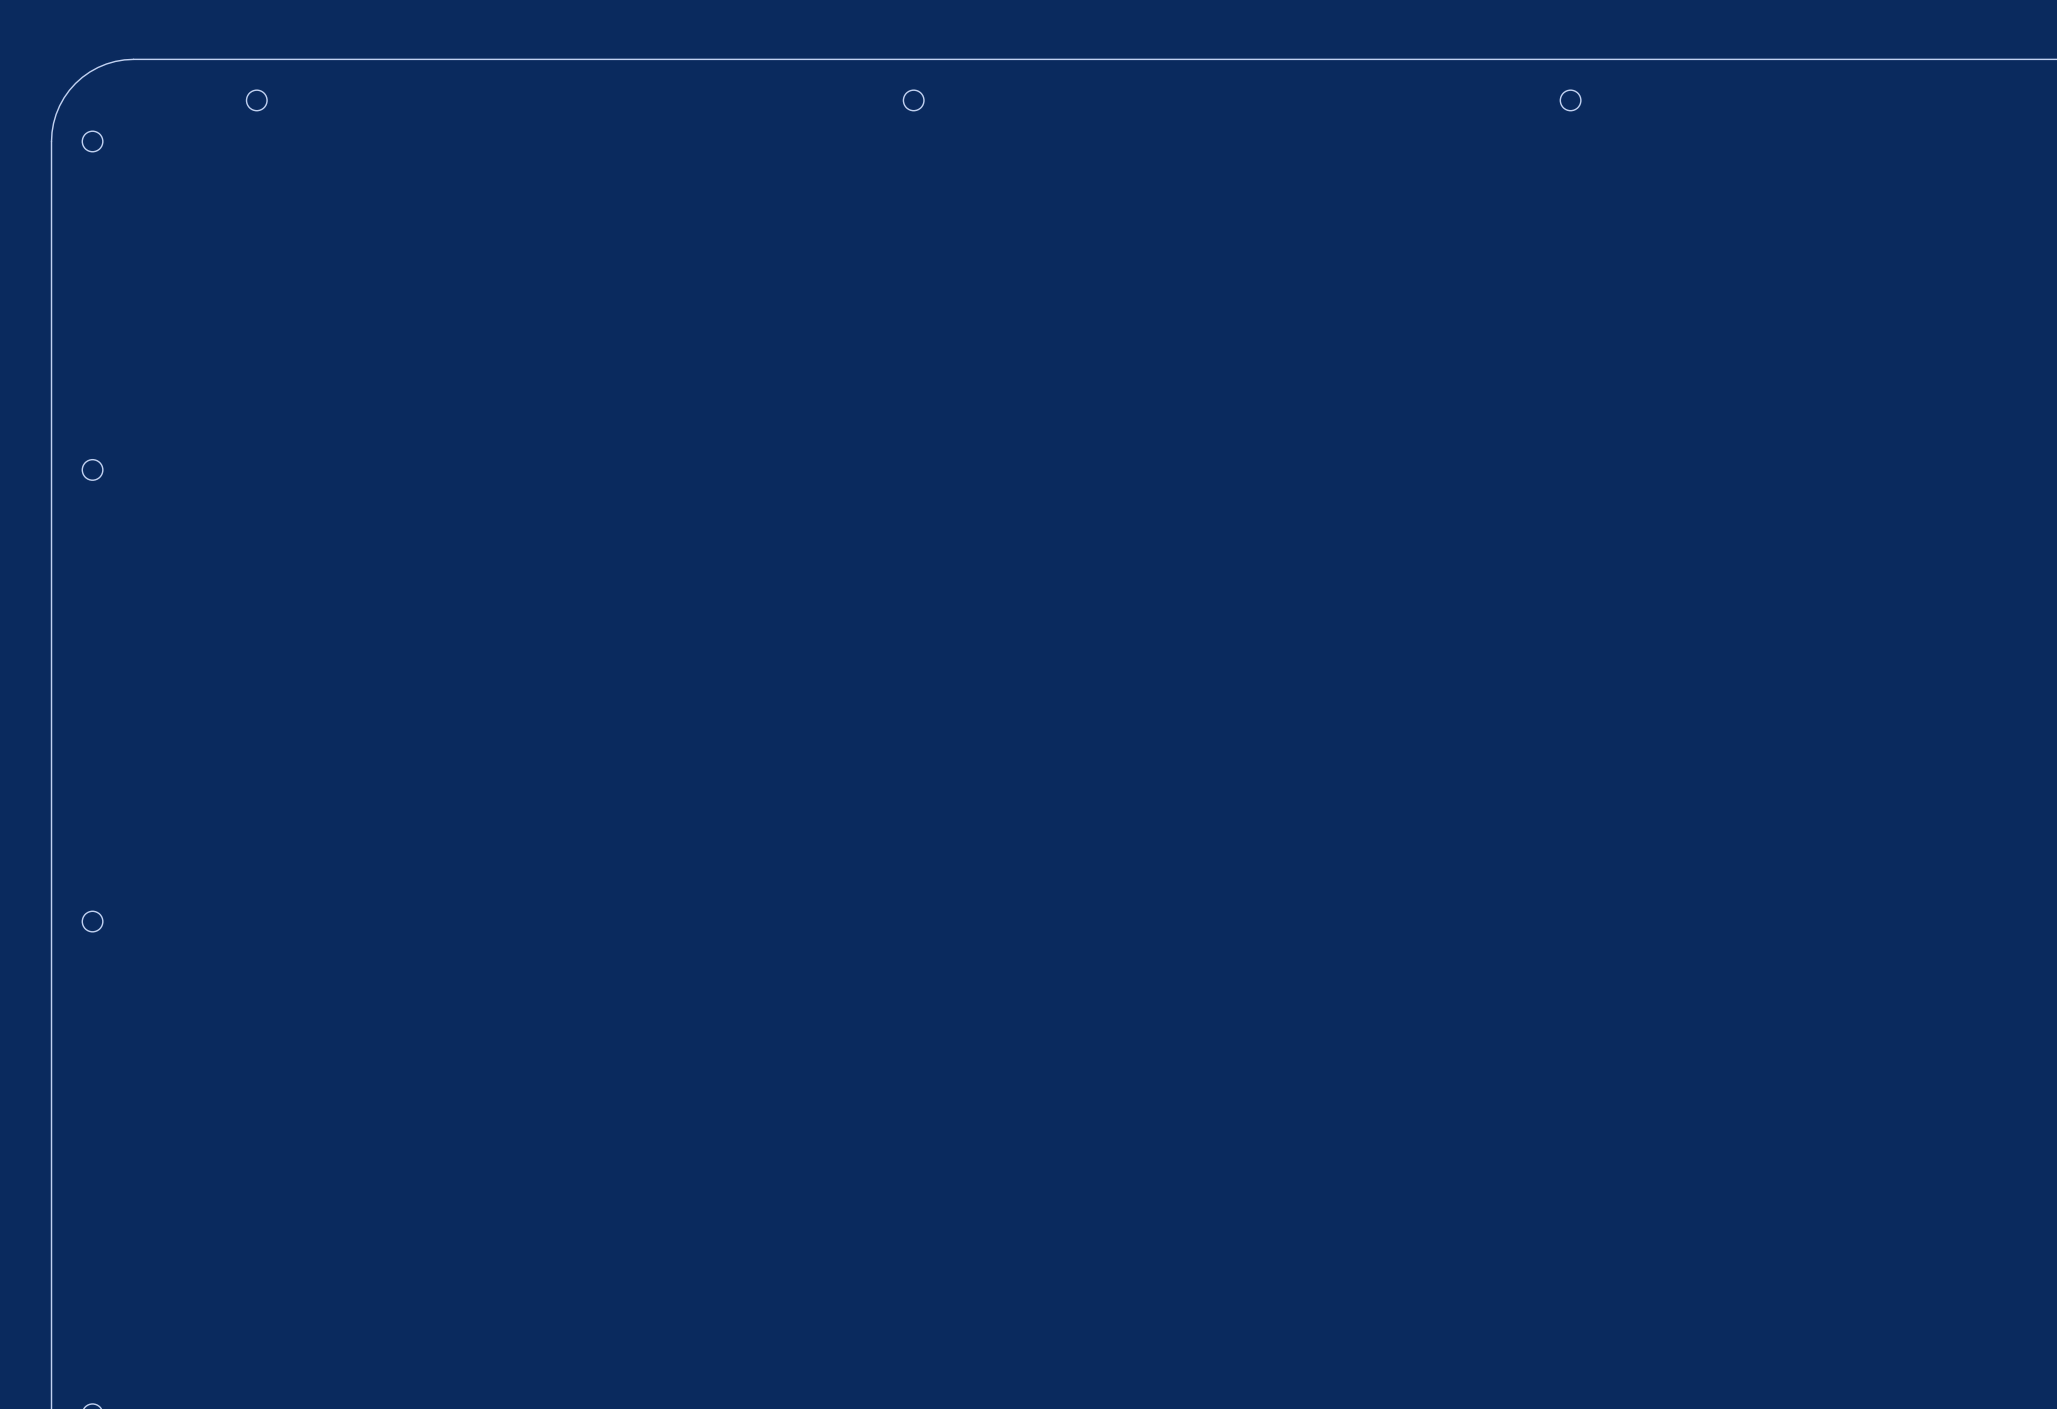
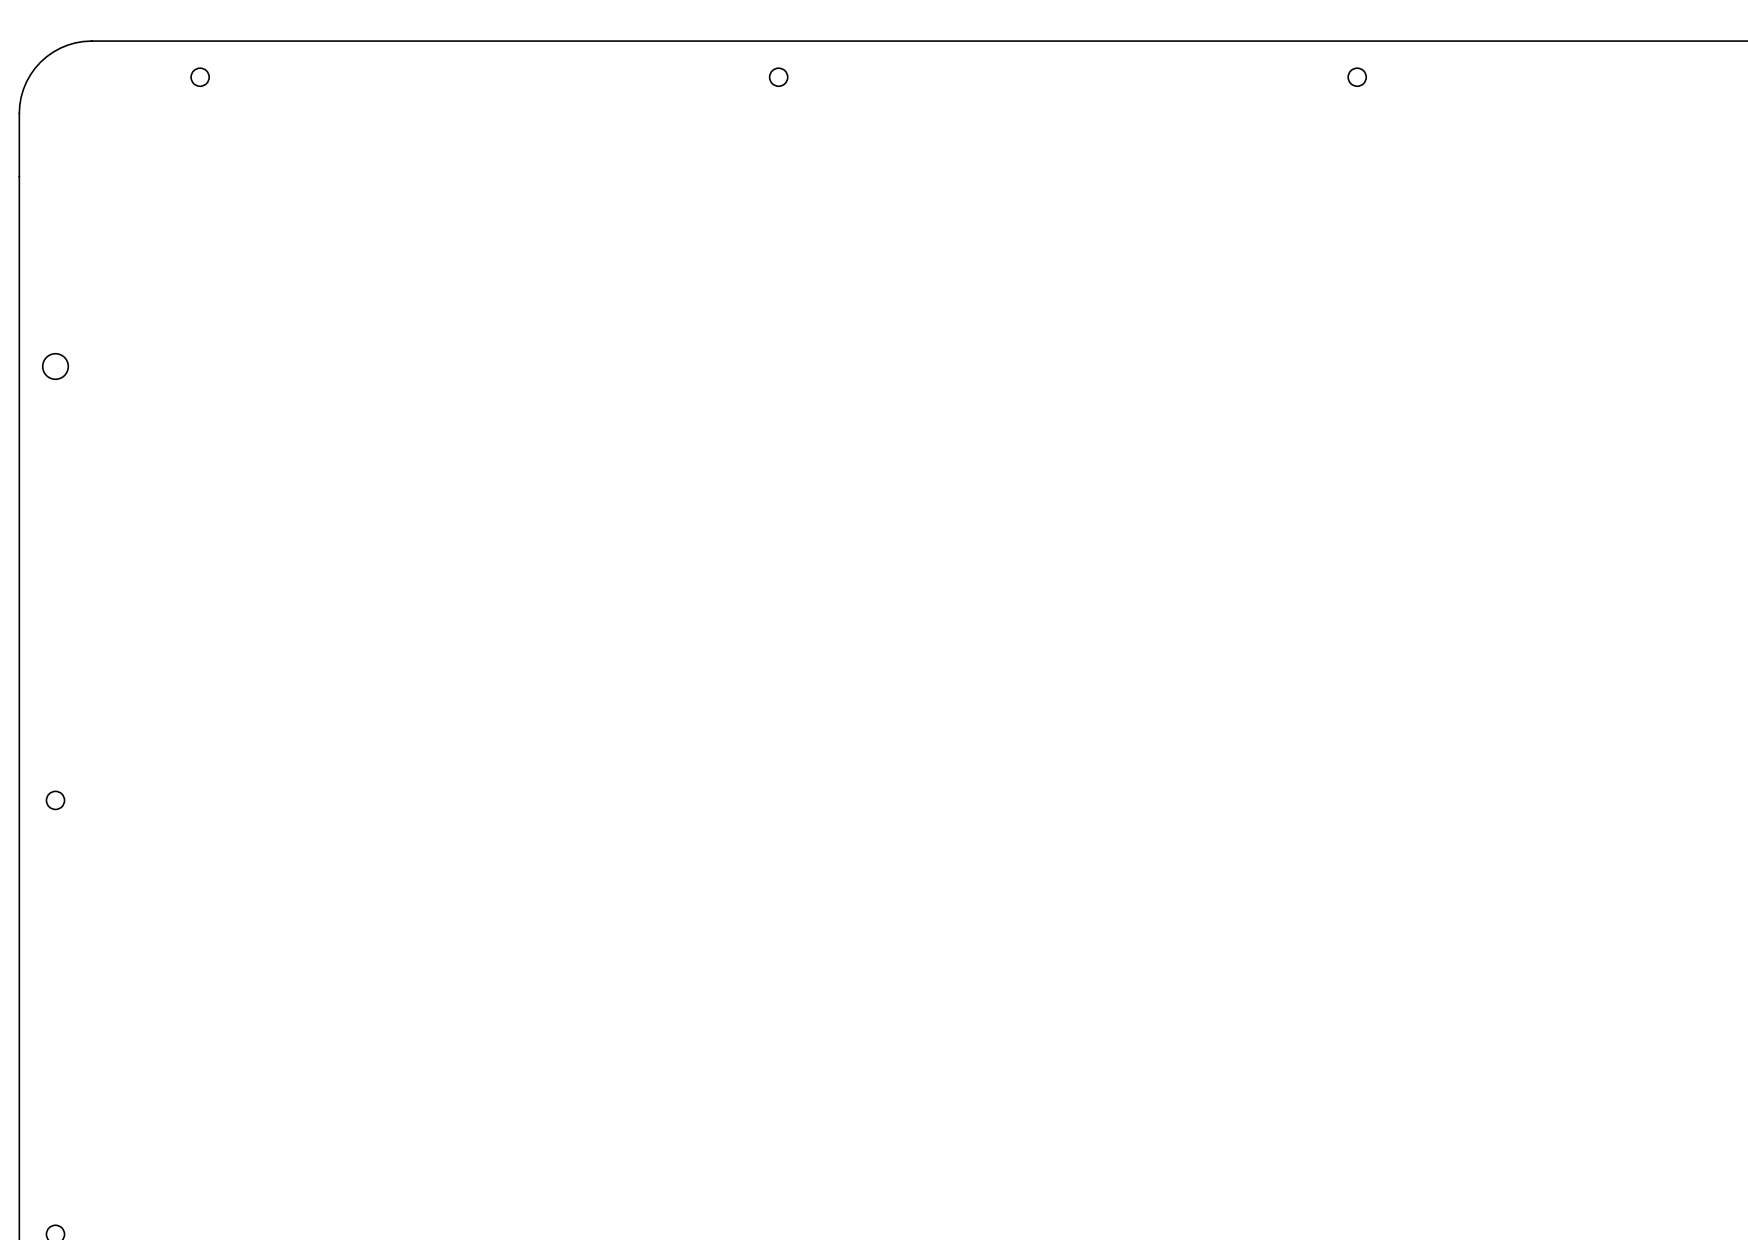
round board edge: [81, 130, 104, 153] -> none
round board edge: none -> [42, 353, 69, 380]
round board edge: [81, 459, 104, 481] -> none

